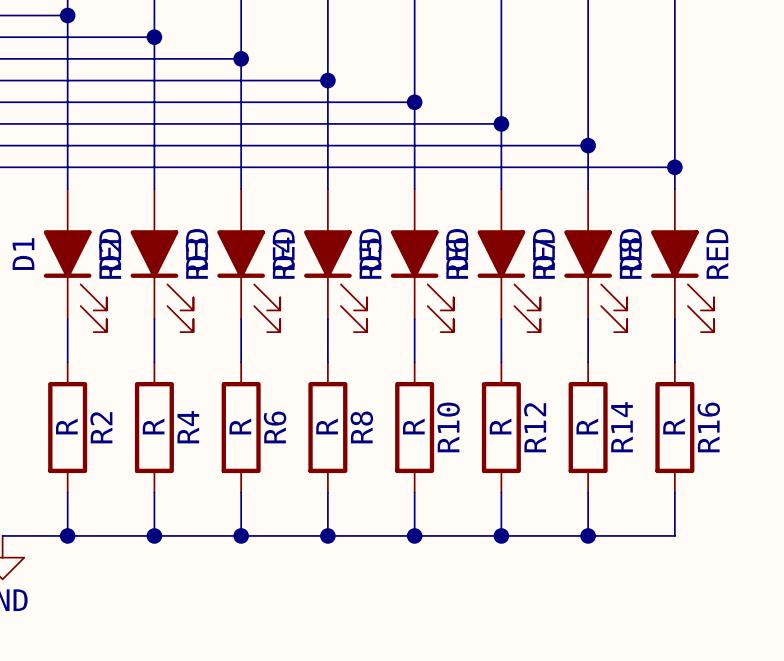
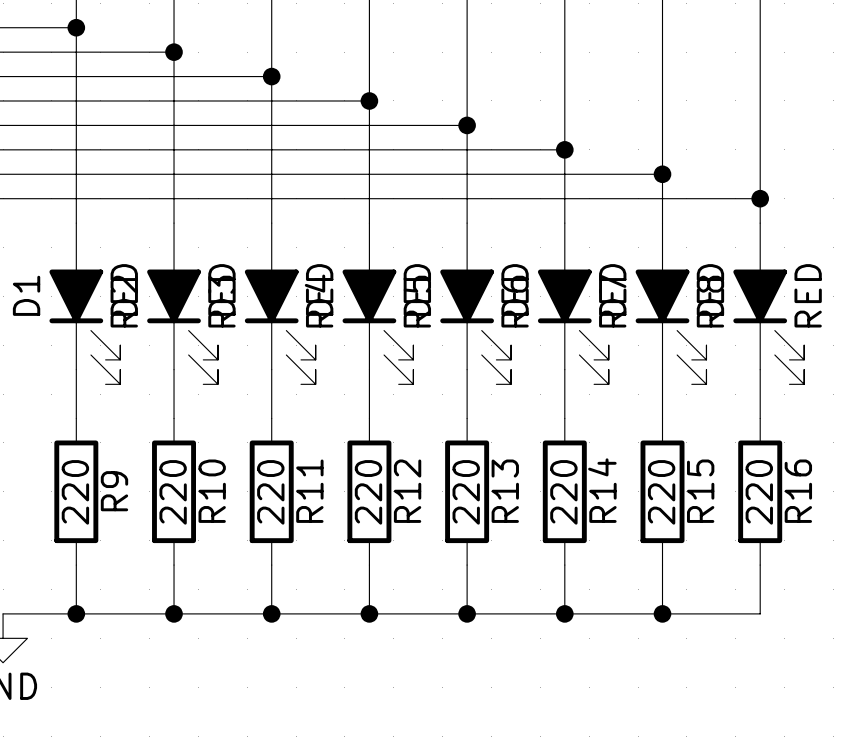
R2 value: R (66, 426) -> 220 (75, 492)
R4 value: R (153, 426) -> 220 (173, 492)
R6 value: R (240, 426) -> 220 (270, 492)
R8 value: R (327, 426) -> 220 (368, 492)
R10 value: R (413, 426) -> 220 (466, 492)
R12 value: R (500, 426) -> 220 (563, 492)
R14 value: R (587, 426) -> 220 (661, 492)
R16 value: R (674, 426) -> 220 (759, 492)
R2 name: R2 (101, 427) -> R9 (114, 491)
R4 name: R4 (188, 427) -> R10 (212, 491)
R6 name: R6 (275, 427) -> R11 (309, 491)
R8 name: R8 (361, 427) -> R12 (407, 491)
R10 name: R10 (448, 427) -> R13 (505, 491)
R12 name: R12 (535, 427) -> R14 (602, 490)
R14 name: R14 (622, 427) -> R15 (700, 491)

